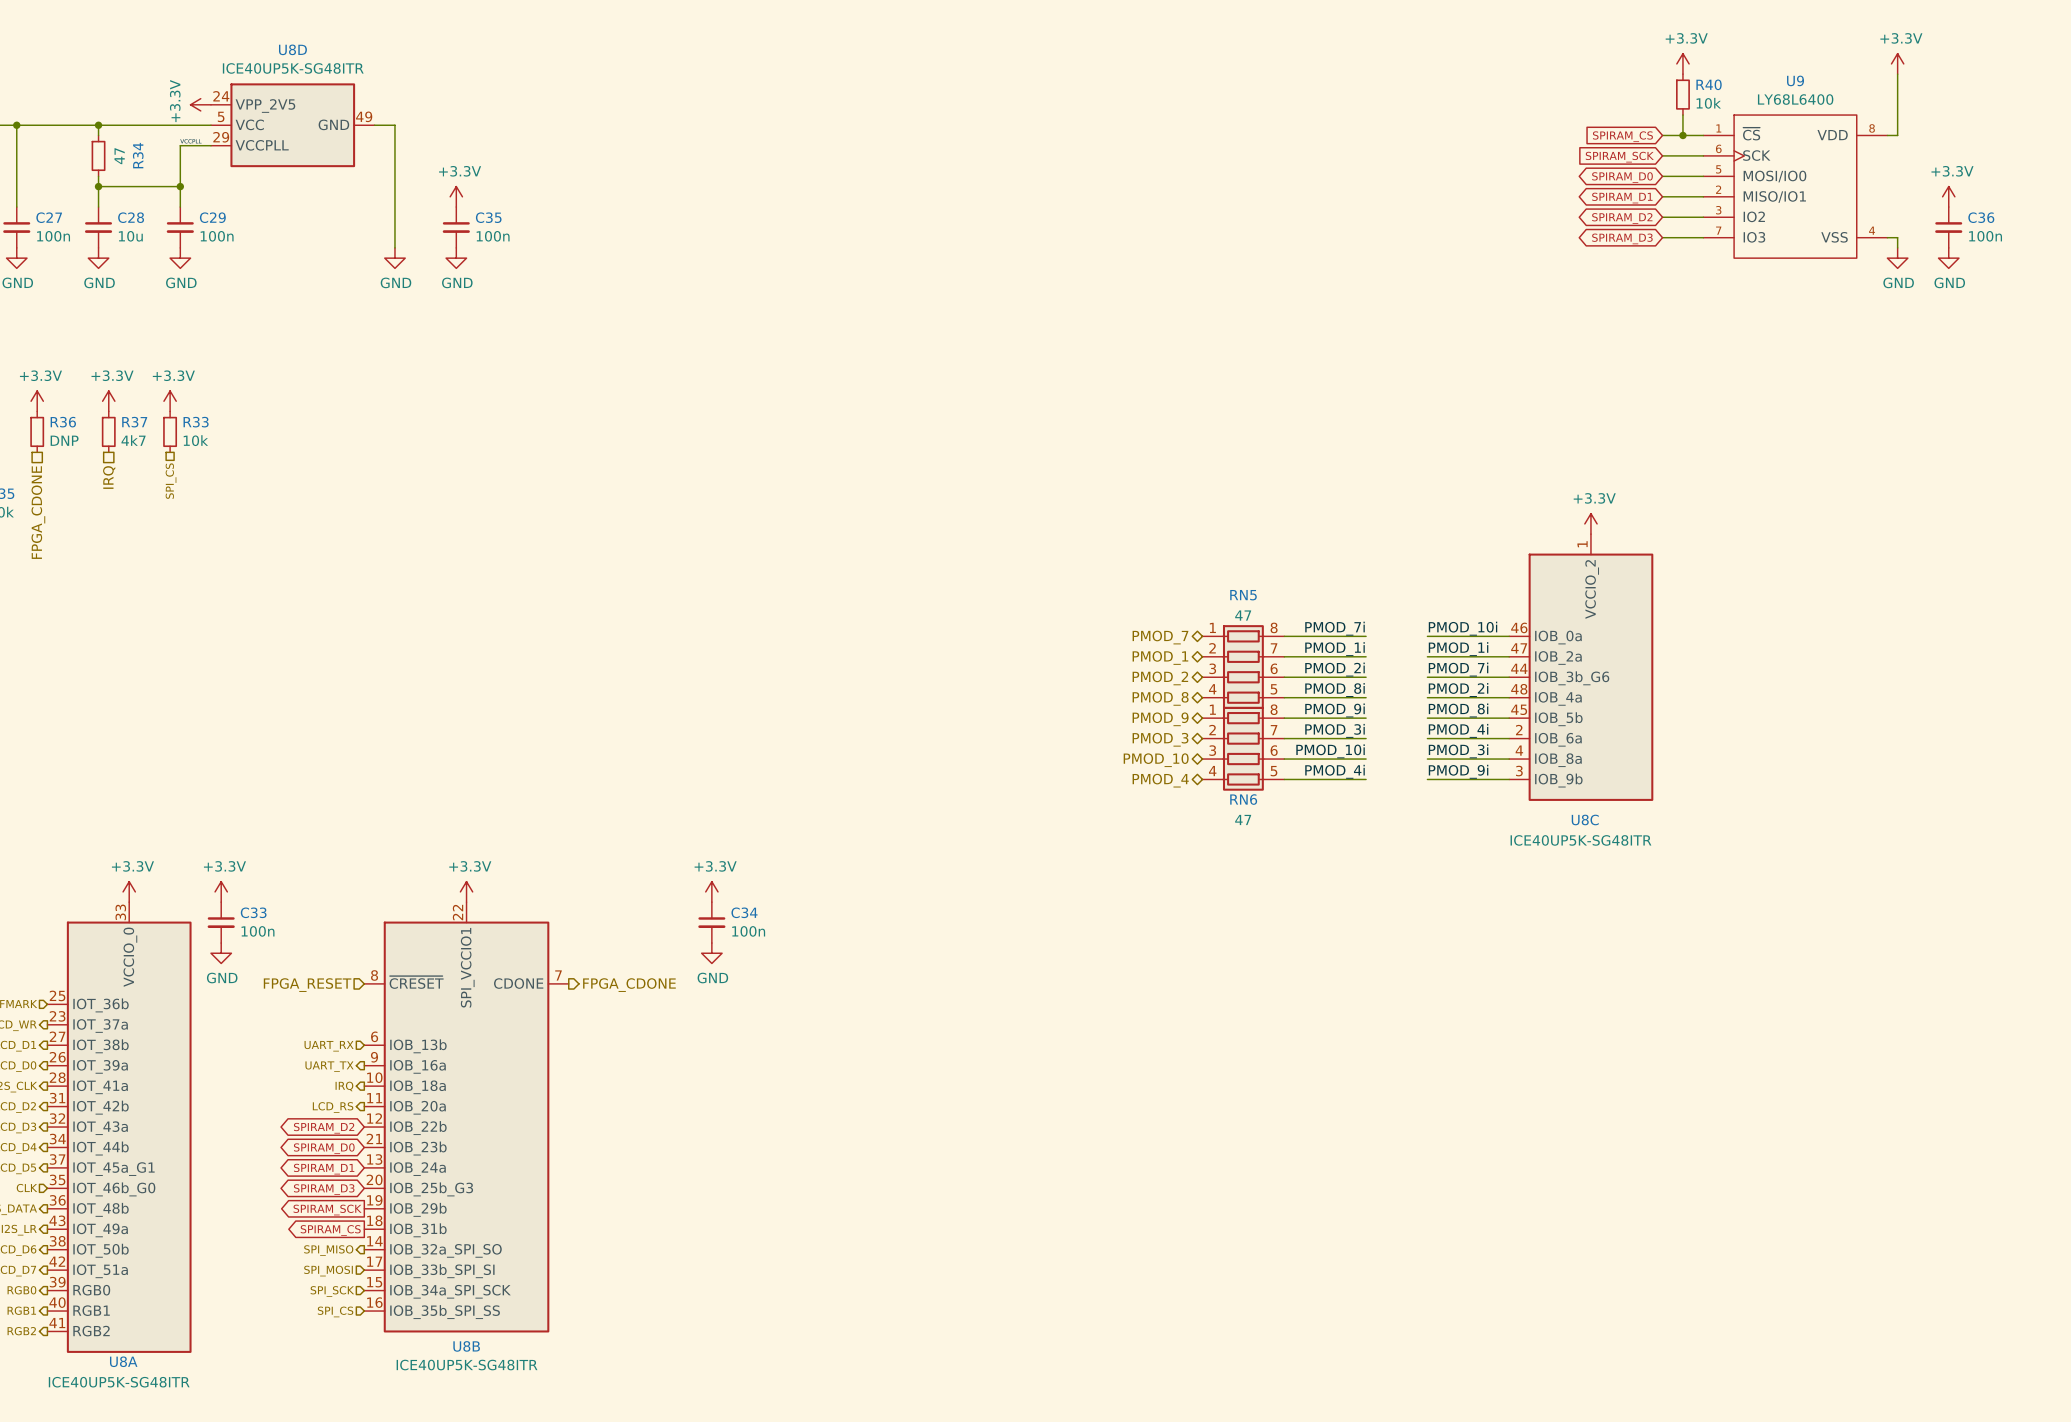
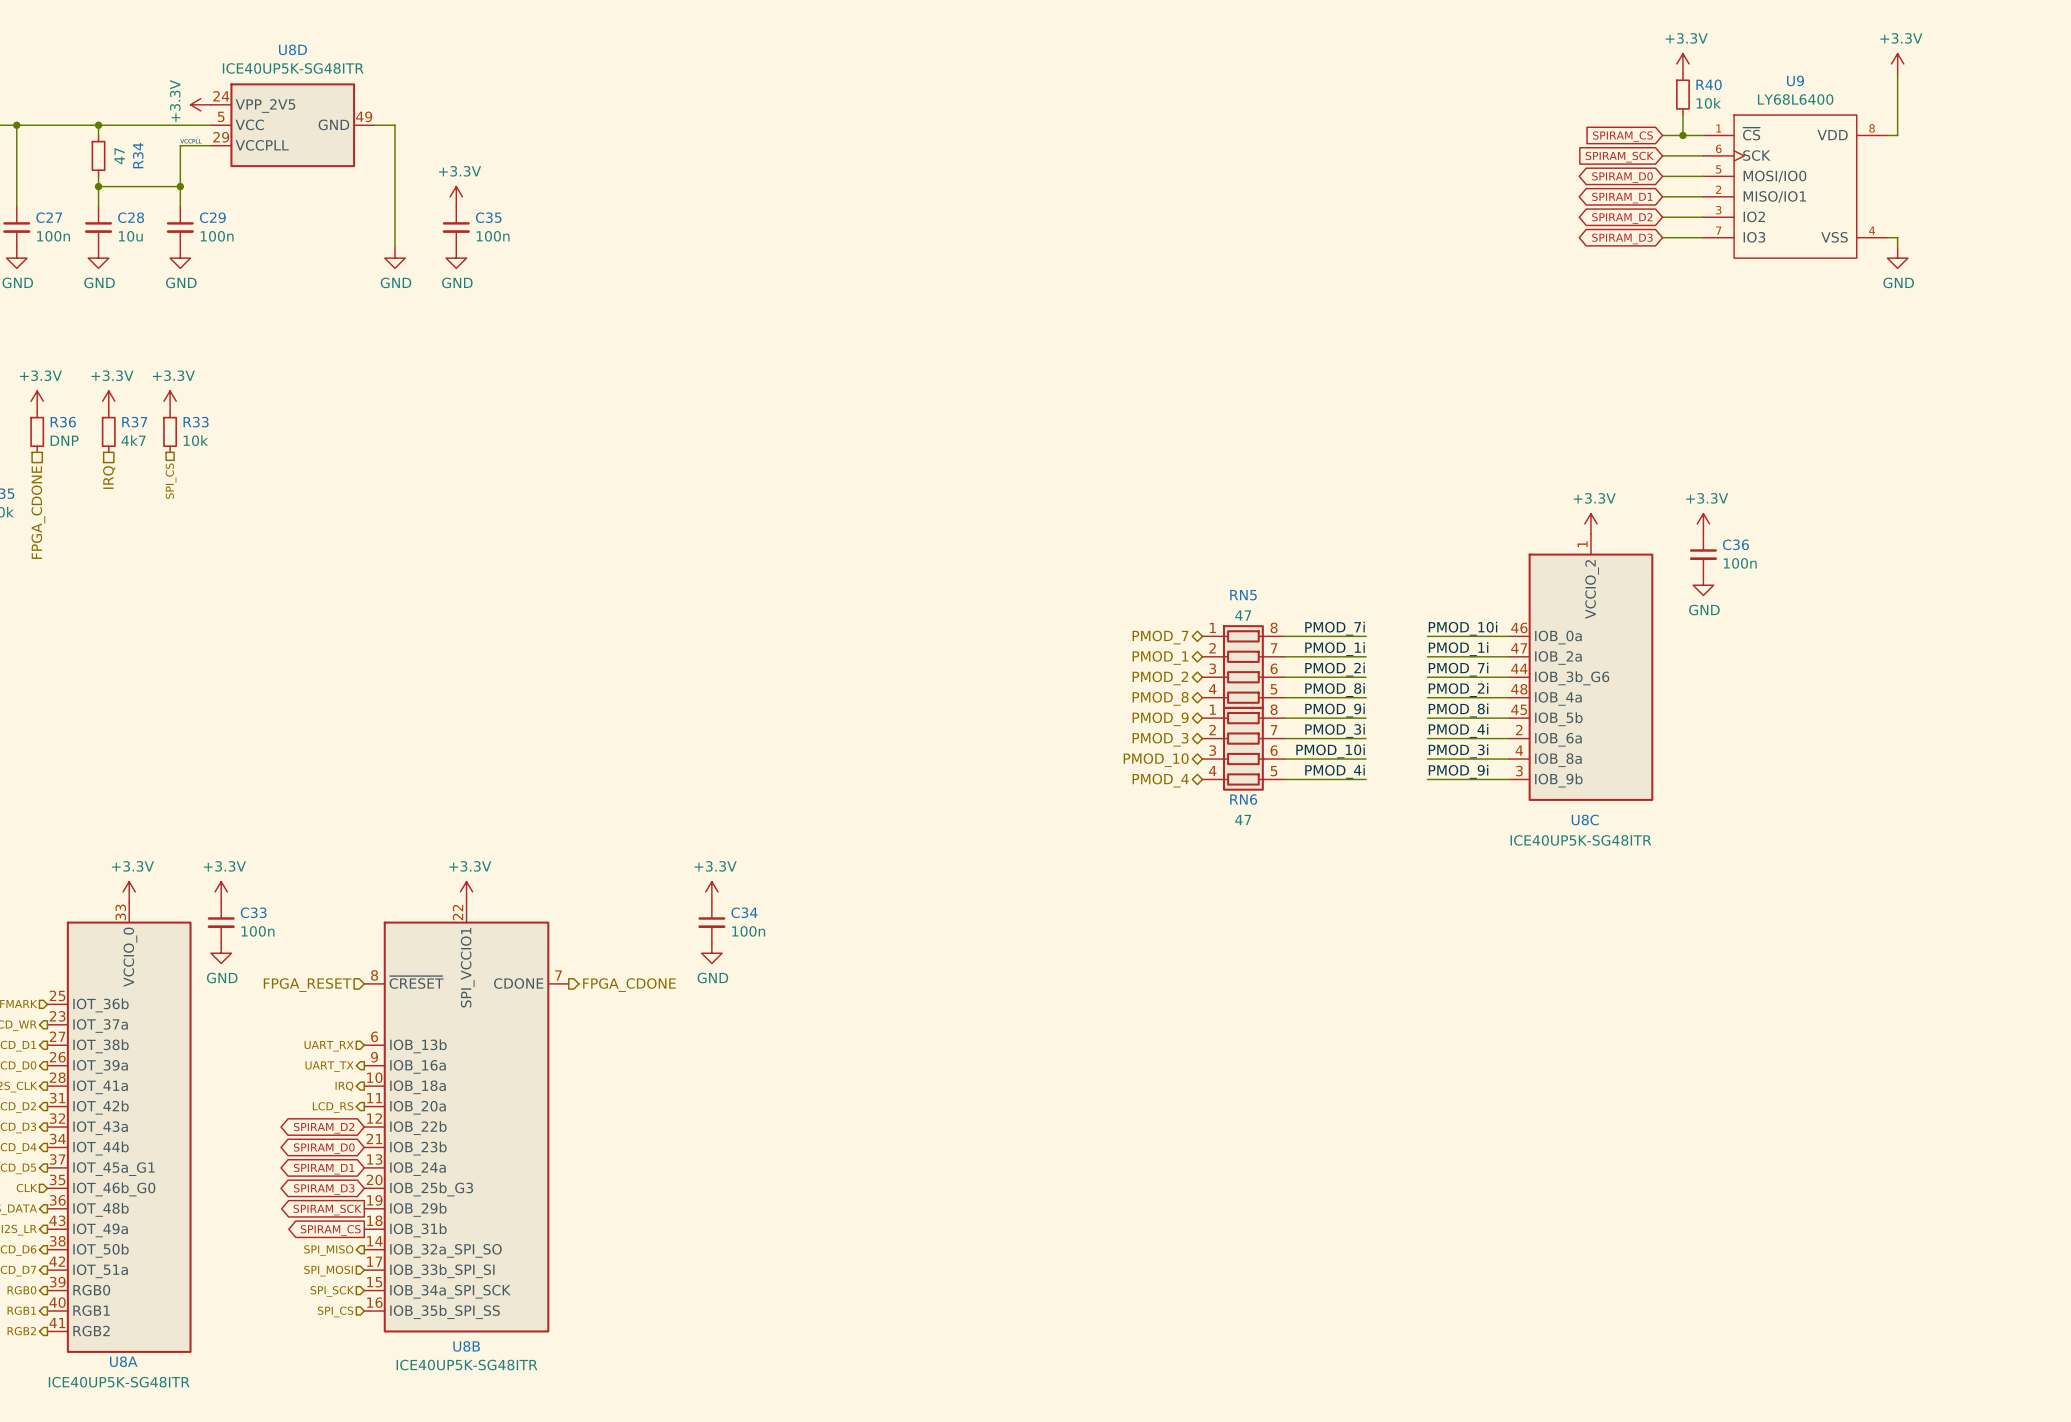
power symbol: +3.3V (1948, 196) -> none
C36 position: (1948, 227) -> (1703, 554)
power symbol: GND (1948, 258) -> none
power symbol: none -> +3.3V (1703, 523)
power symbol: none -> GND (1703, 585)

